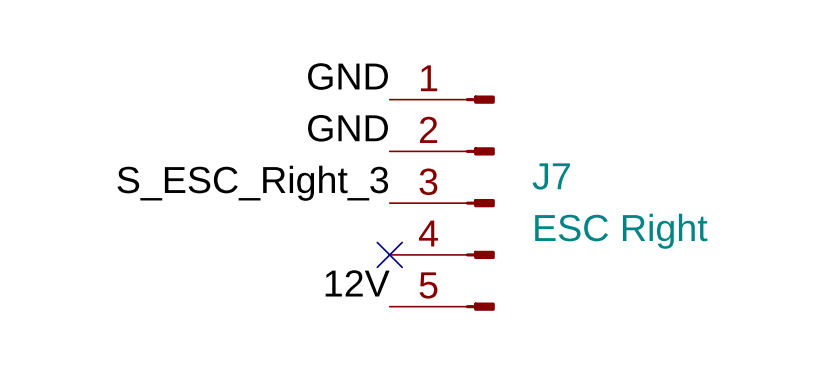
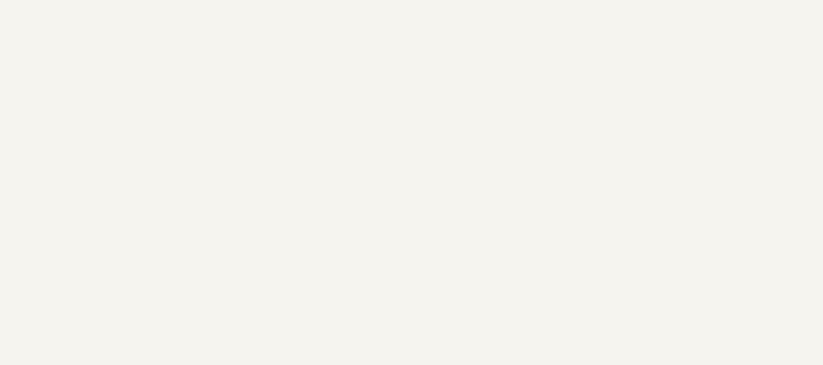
label: GND (347, 76) -> none
label: GND (347, 128) -> none
label: S_ESC_Right_3 (252, 183) -> none
J7: ESC Right (442, 203) -> none
no-connect mark: (389, 254) -> none
label: 12V (357, 283) -> none

